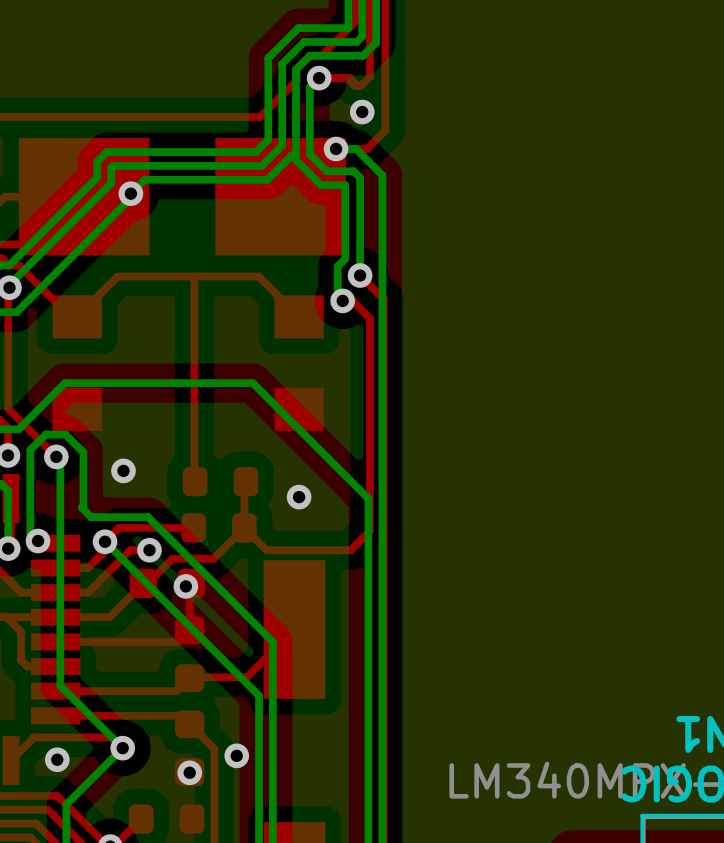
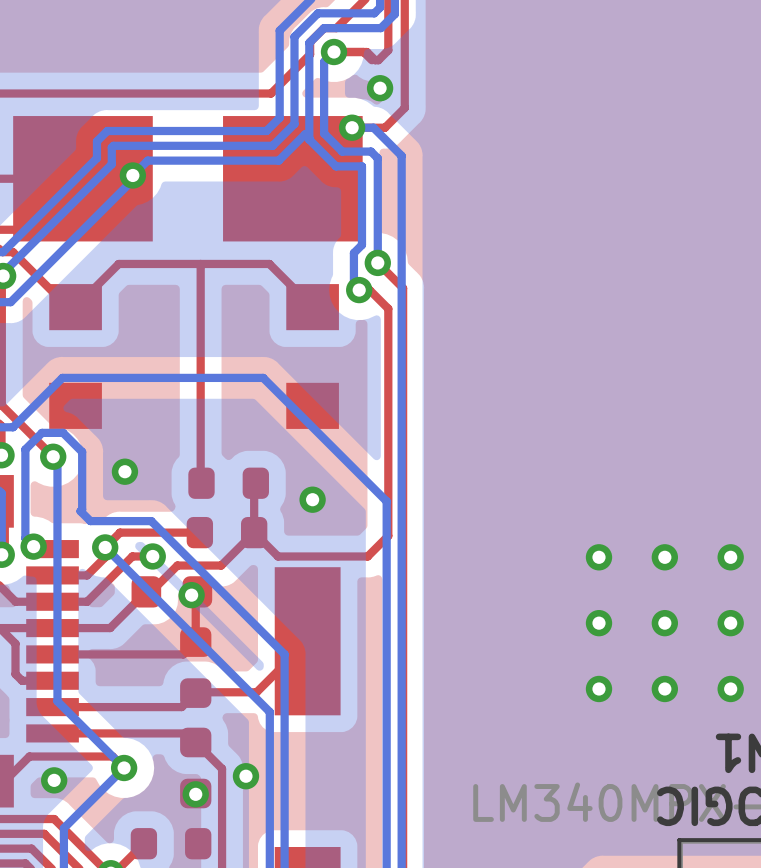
via: none -> (599, 557)
via: none -> (664, 557)
via: none -> (730, 557)
via: none -> (599, 623)
via: none -> (664, 623)
via: none -> (730, 623)
via: none -> (599, 688)
via: none -> (664, 688)
via: none -> (730, 688)

